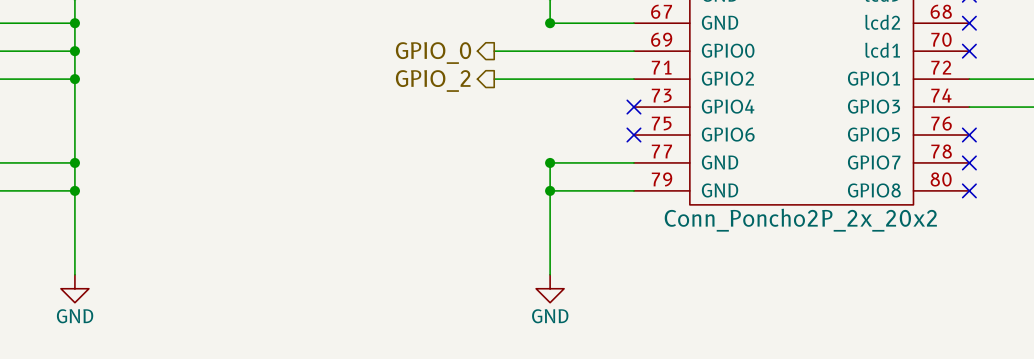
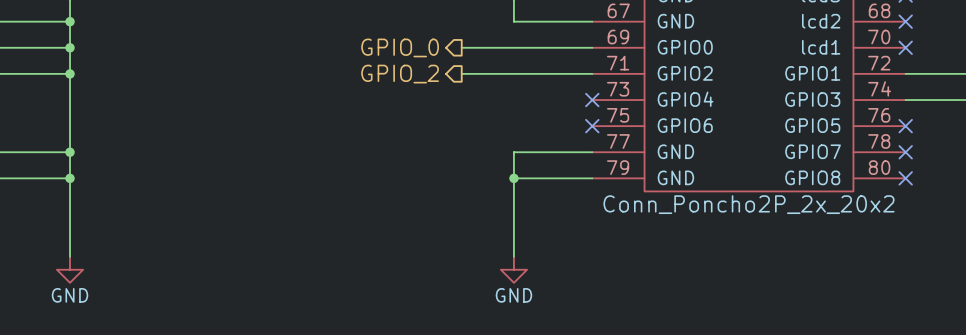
junction: (550, 23) -> none
junction: (550, 162) -> none

